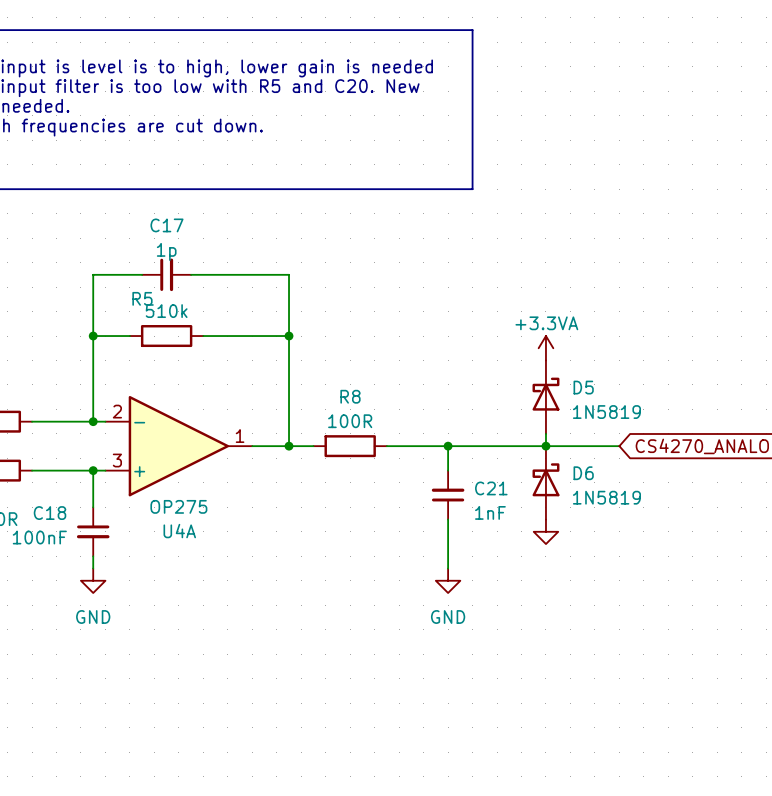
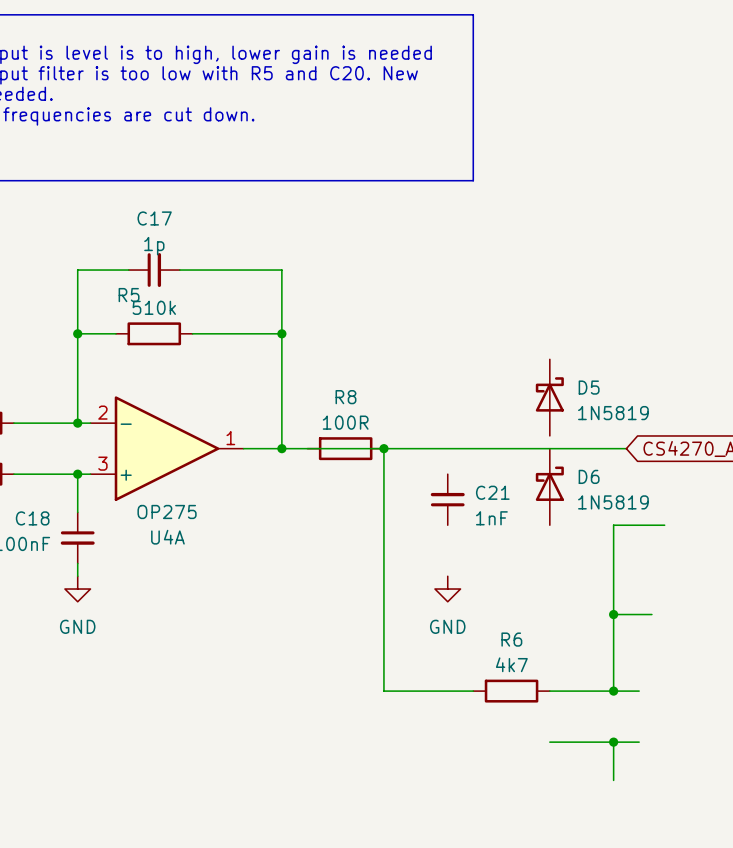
power symbol: +3.3VA (545, 348) -> none
wire: (545, 433) (545, 446) -> none
wire: none -> (307, 448) (383, 448) (383, 691) (473, 691)
junction: none -> (383, 448)
wire: (448, 446) (448, 470) -> none
junction: (448, 446) -> none
junction: (545, 446) -> none
wire: (448, 519) (448, 568) -> none
wire: none -> (664, 525) (613, 525) (613, 691)
power symbol: (545, 531) -> none
wire: none -> (613, 614) (651, 614)
junction: none -> (613, 614)
R6: none -> 4k7 (511, 691)
wire: none -> (549, 691) (639, 691)
junction: none -> (613, 691)
wire: none -> (549, 742) (639, 742)
wire: none -> (613, 742) (613, 780)
junction: none -> (613, 742)

